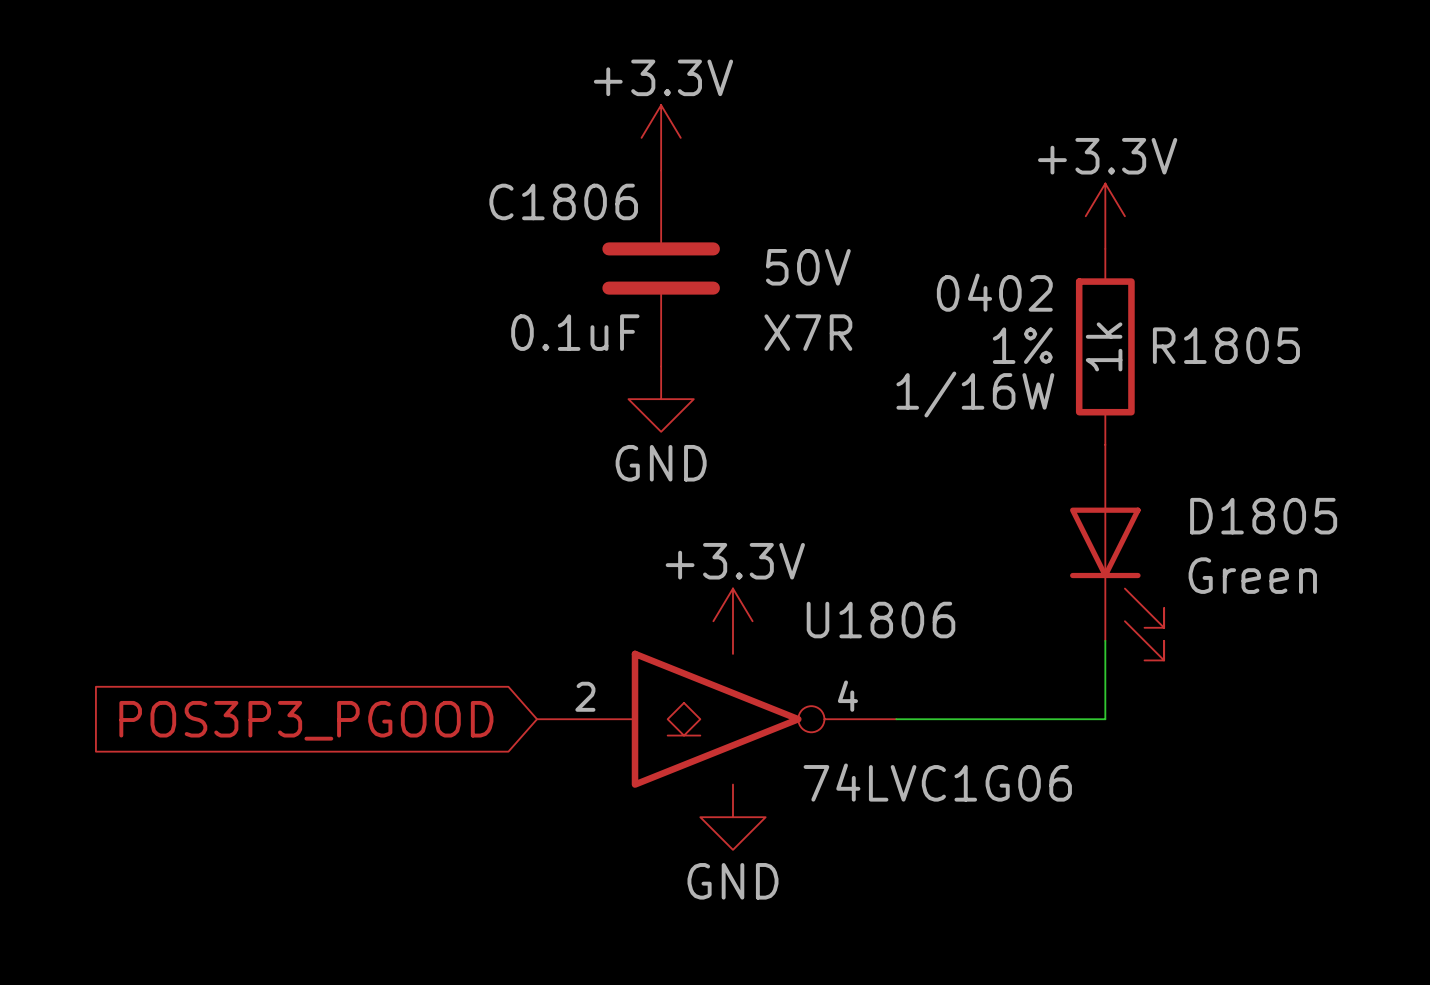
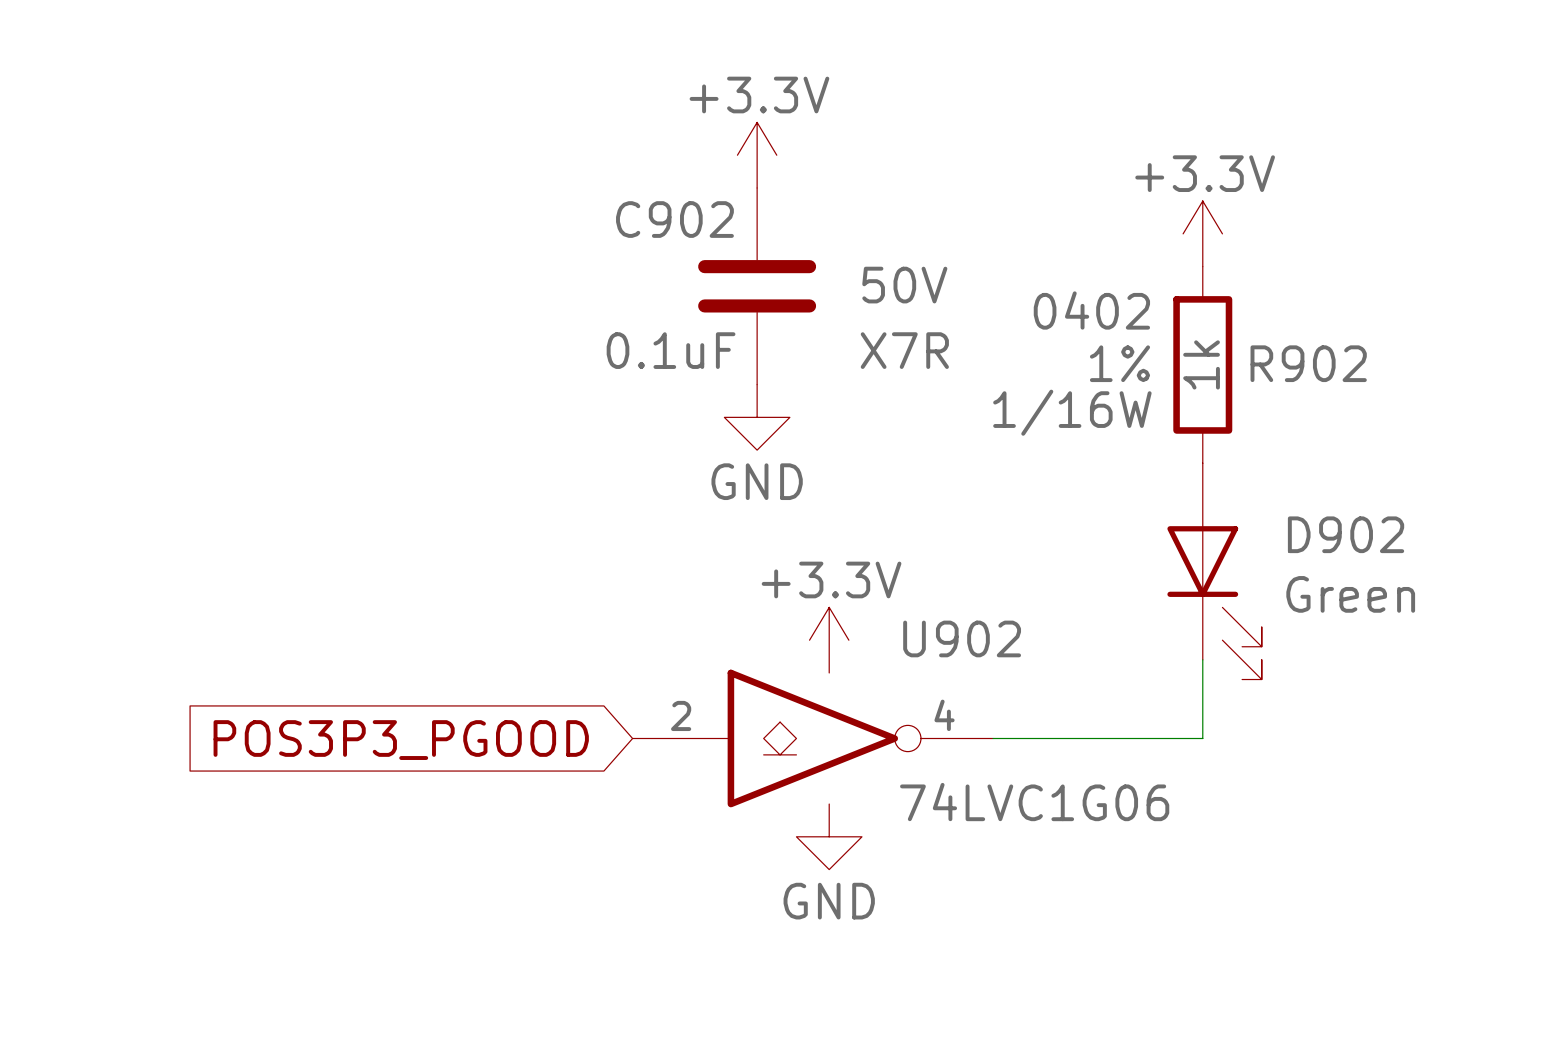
C1806 name: C1806 (563, 201) -> C902 (674, 219)
R1805 name: R1805 (1226, 345) -> R902 (1308, 363)
D1805 name: D1805 (1263, 516) -> D902 (1346, 534)
U1806 name: U1806 (880, 620) -> U902 (962, 638)

